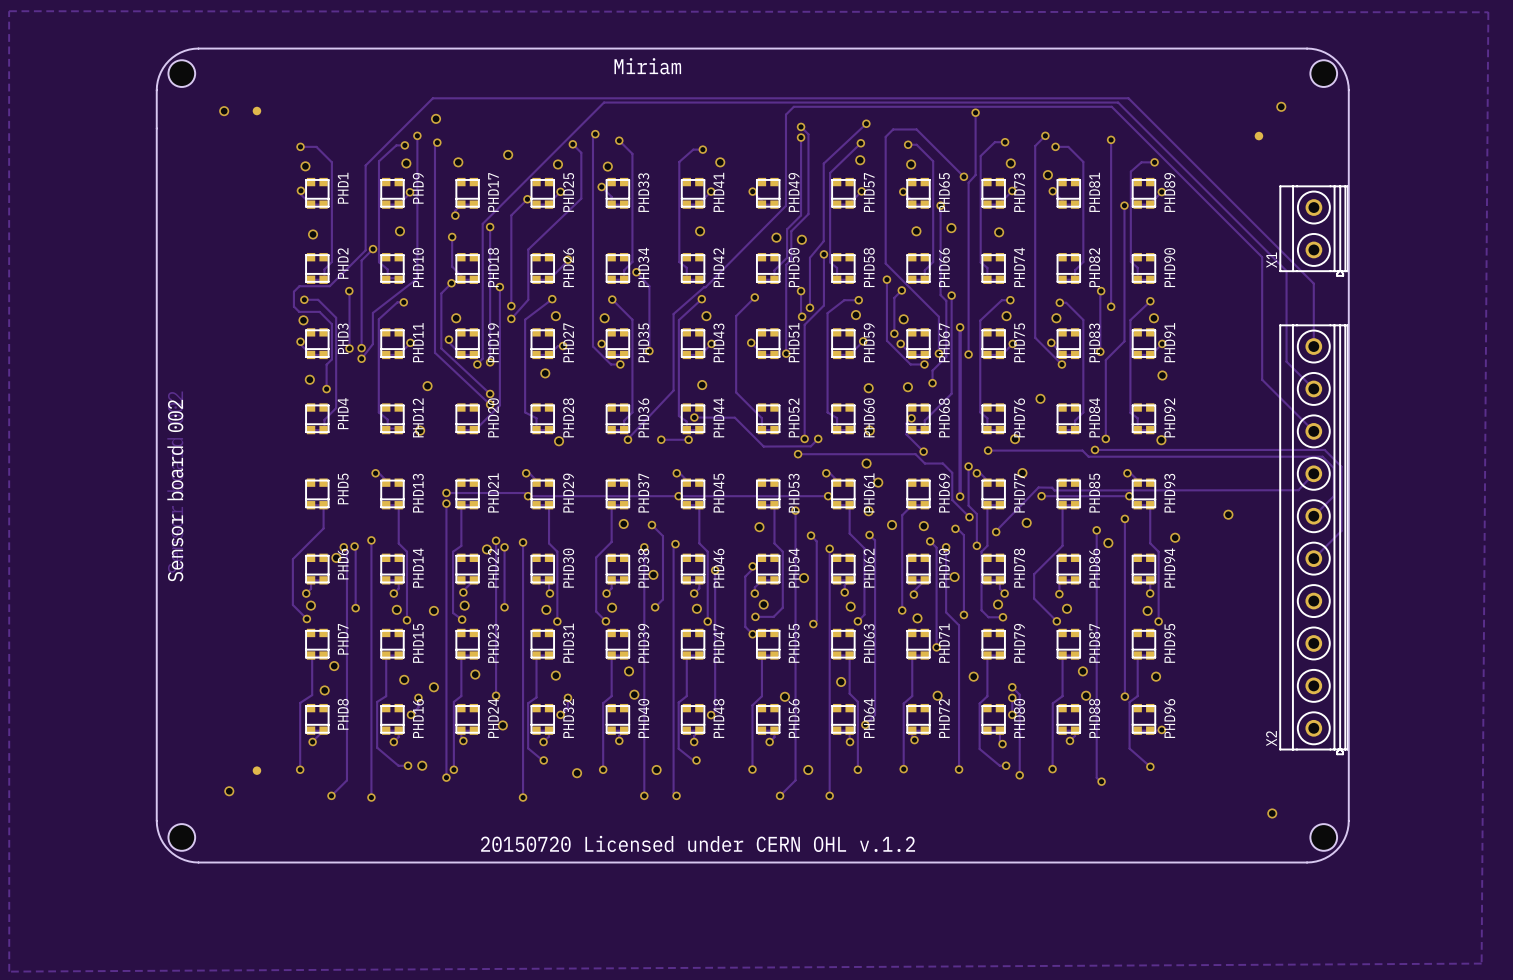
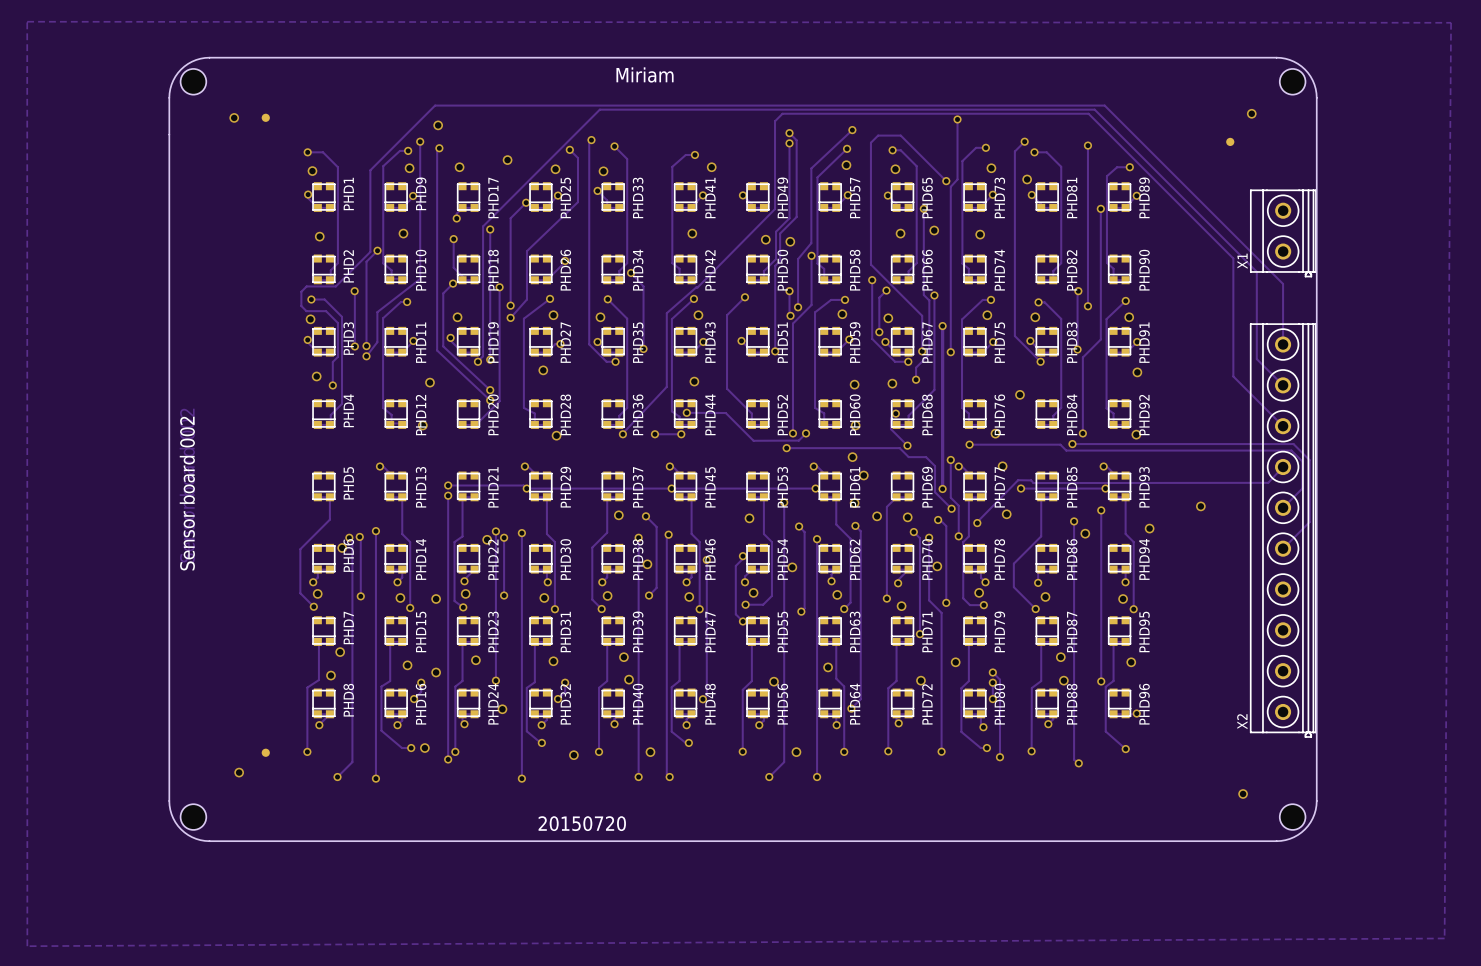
text: 20150720 Licensed under CERN OHL v.1.2 (698, 843) -> none
text: none -> 20150720 (582, 823)

